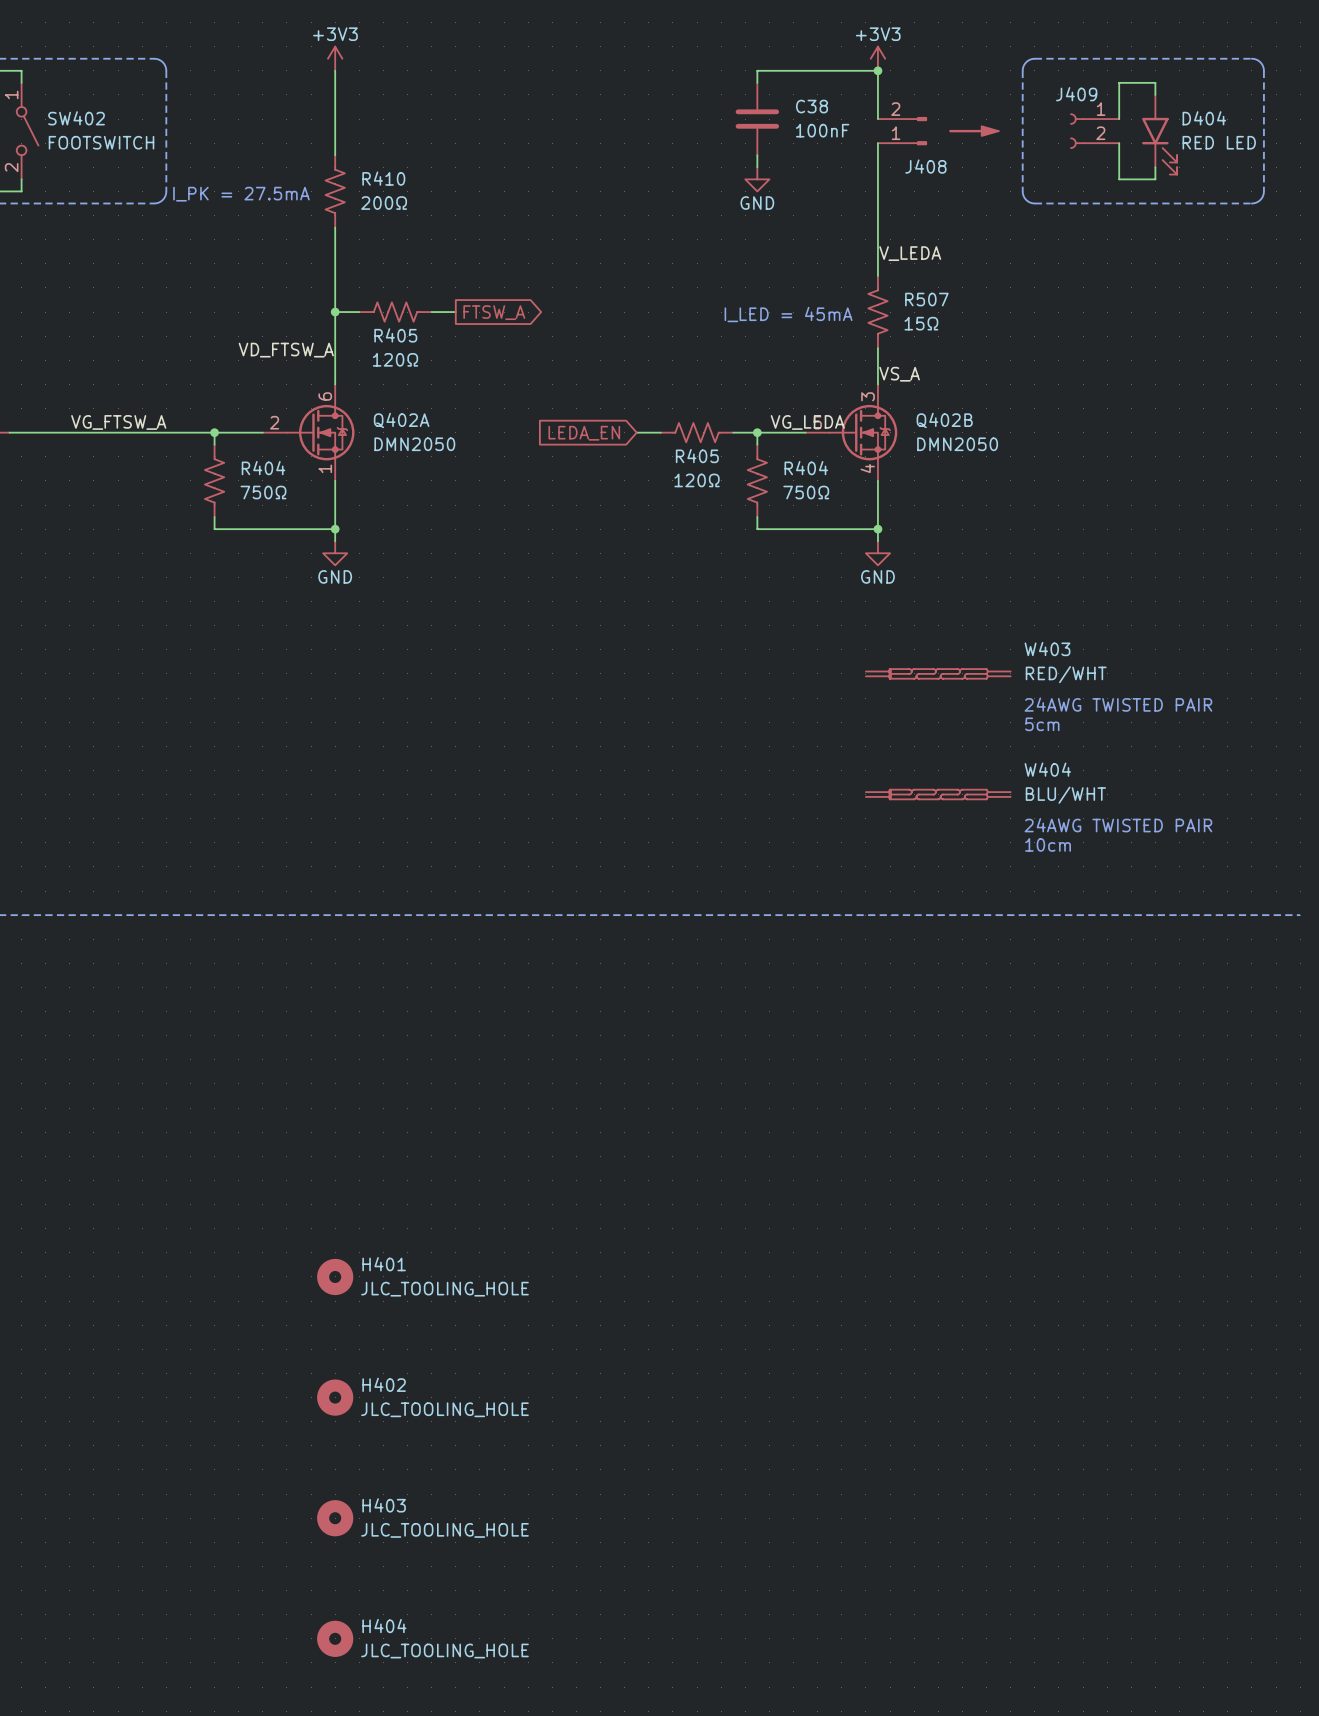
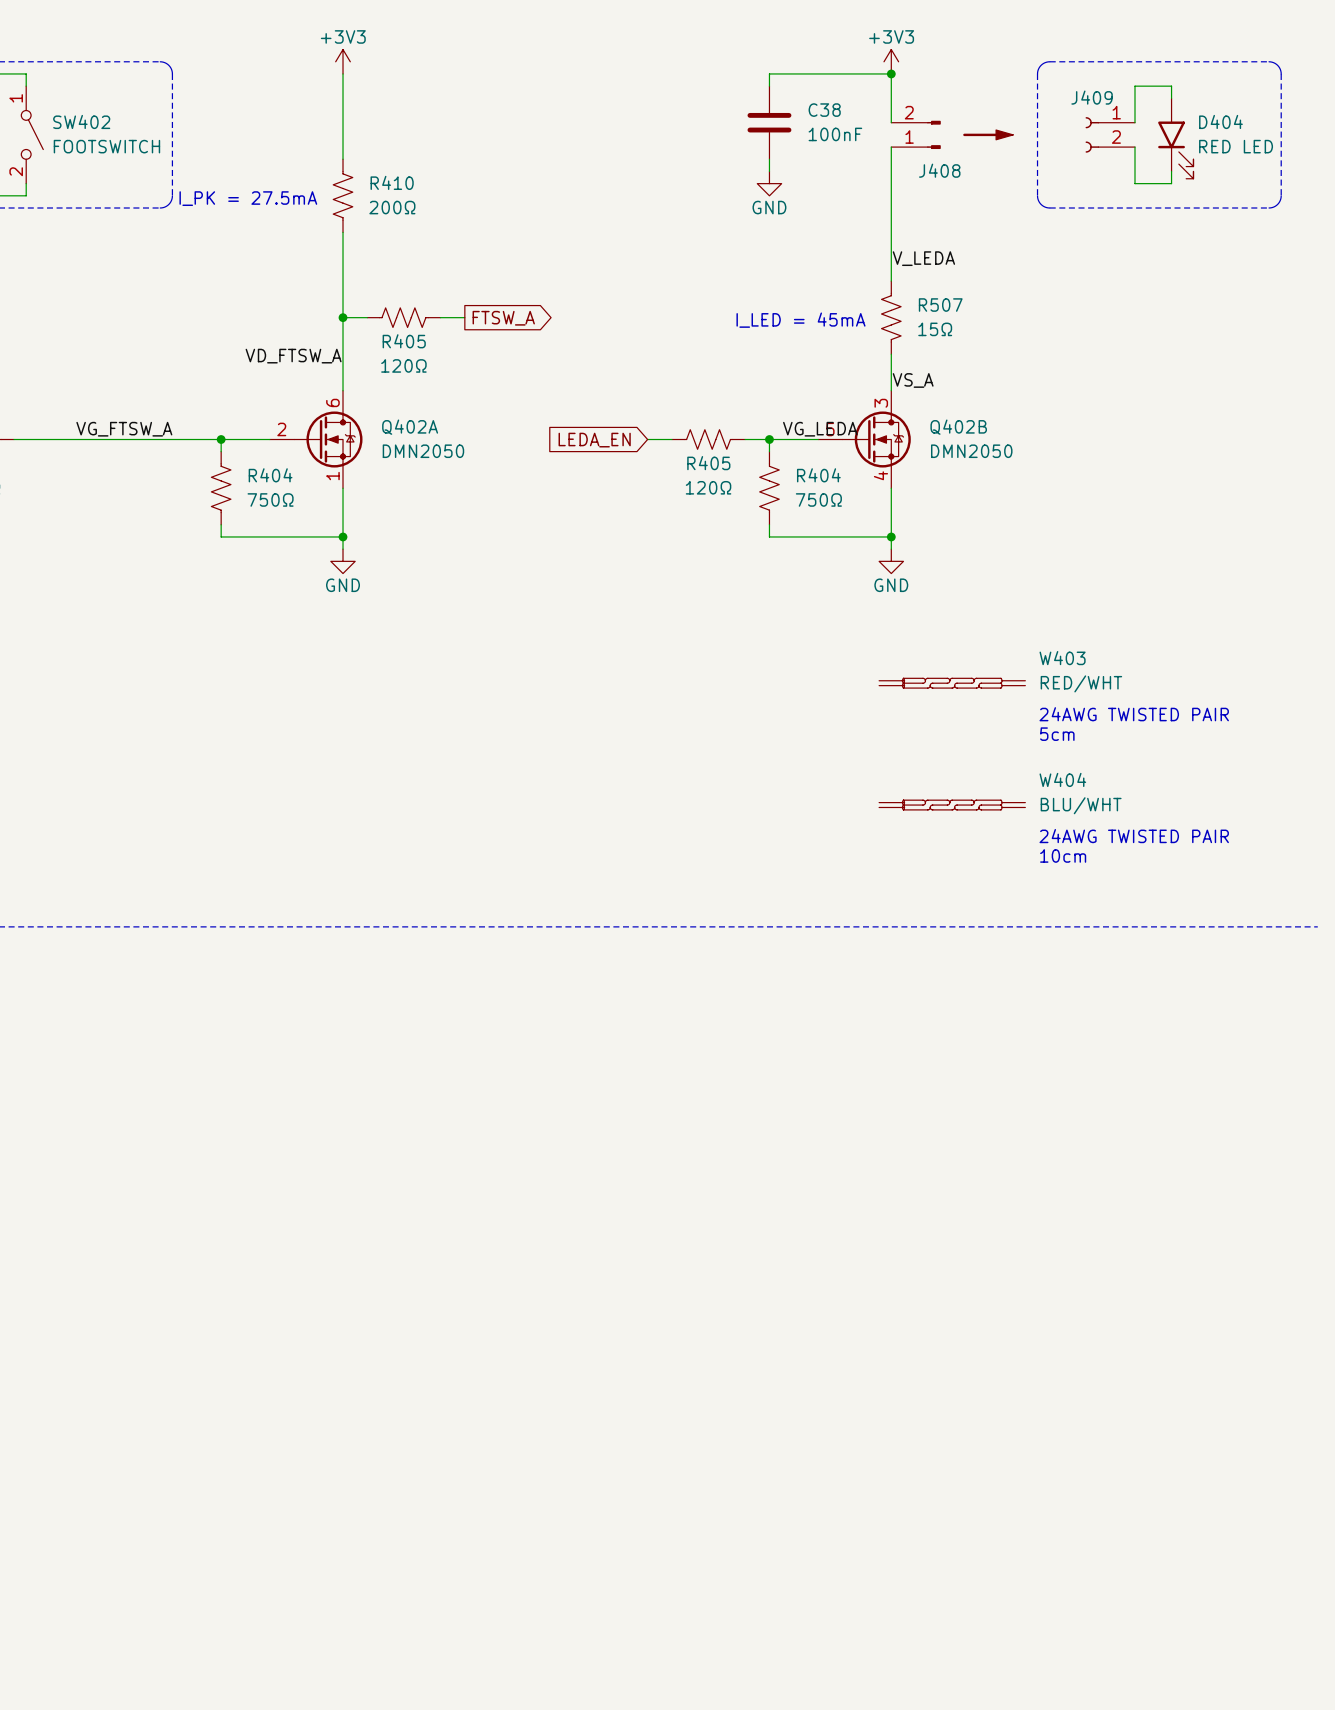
H401: JLC_TOOLING_HOLE (335, 1276) -> none
H402: JLC_TOOLING_HOLE (335, 1397) -> none
H403: JLC_TOOLING_HOLE (335, 1518) -> none
H404: JLC_TOOLING_HOLE (335, 1638) -> none

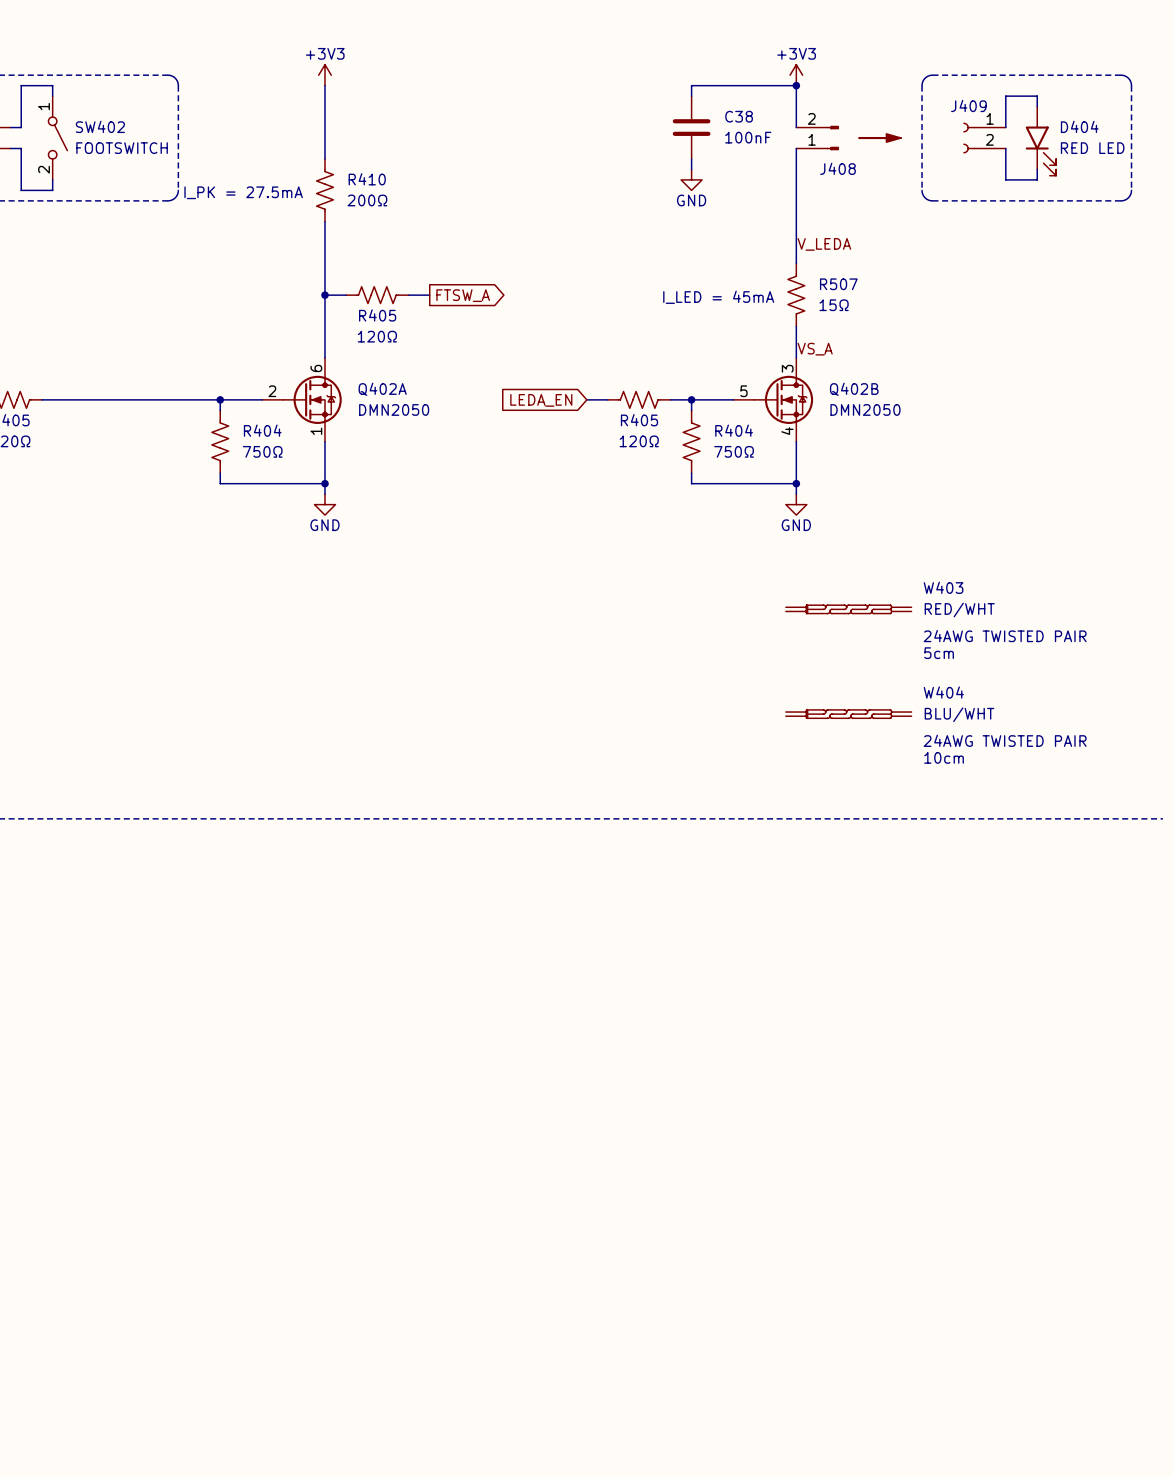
label: VD_FTSW_A (293, 356) -> none
label: VG_FTSW_A (124, 429) -> none
label: VG_LEDA (820, 429) -> none

